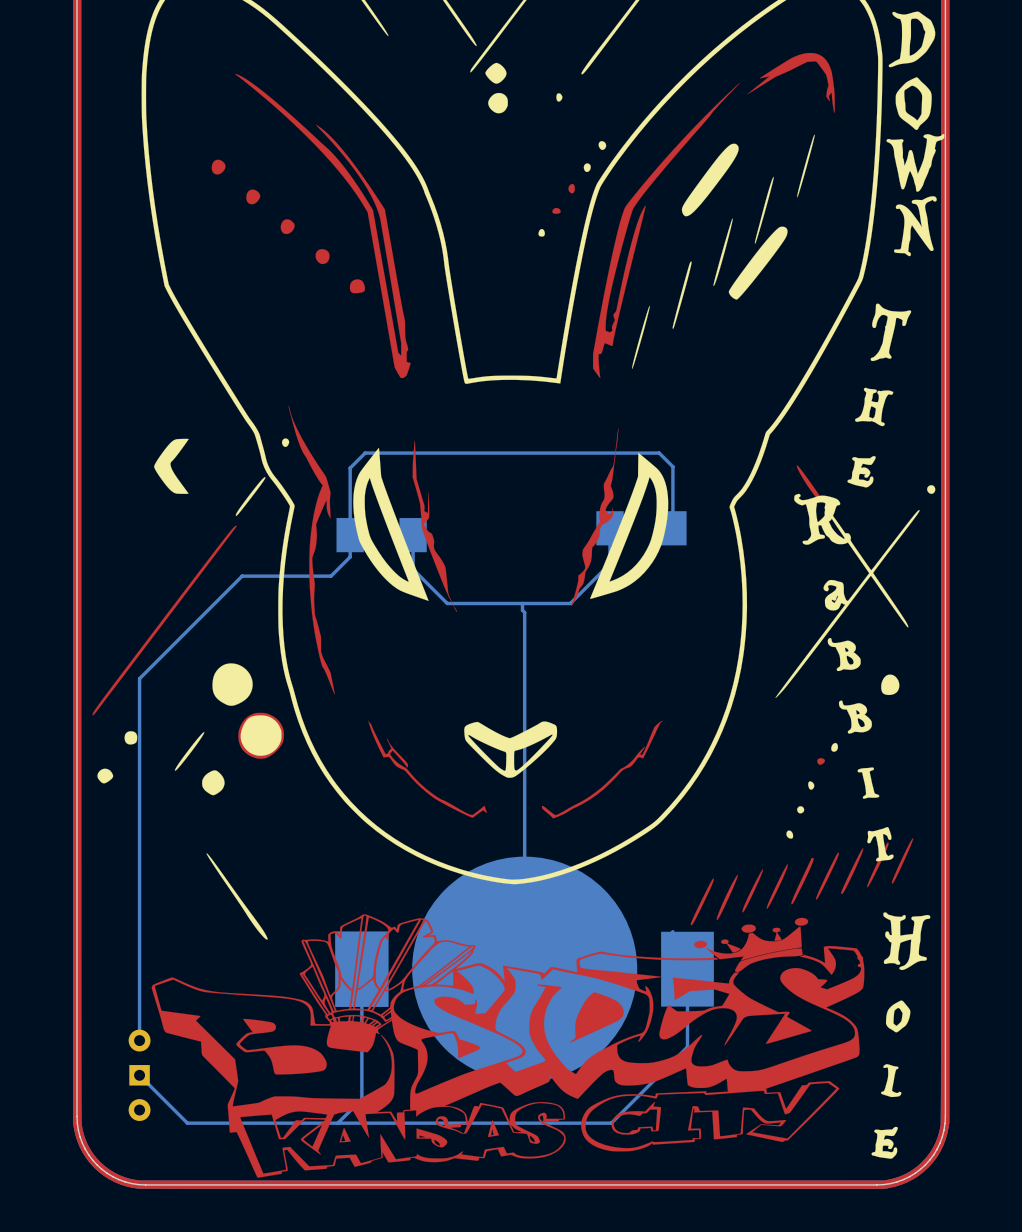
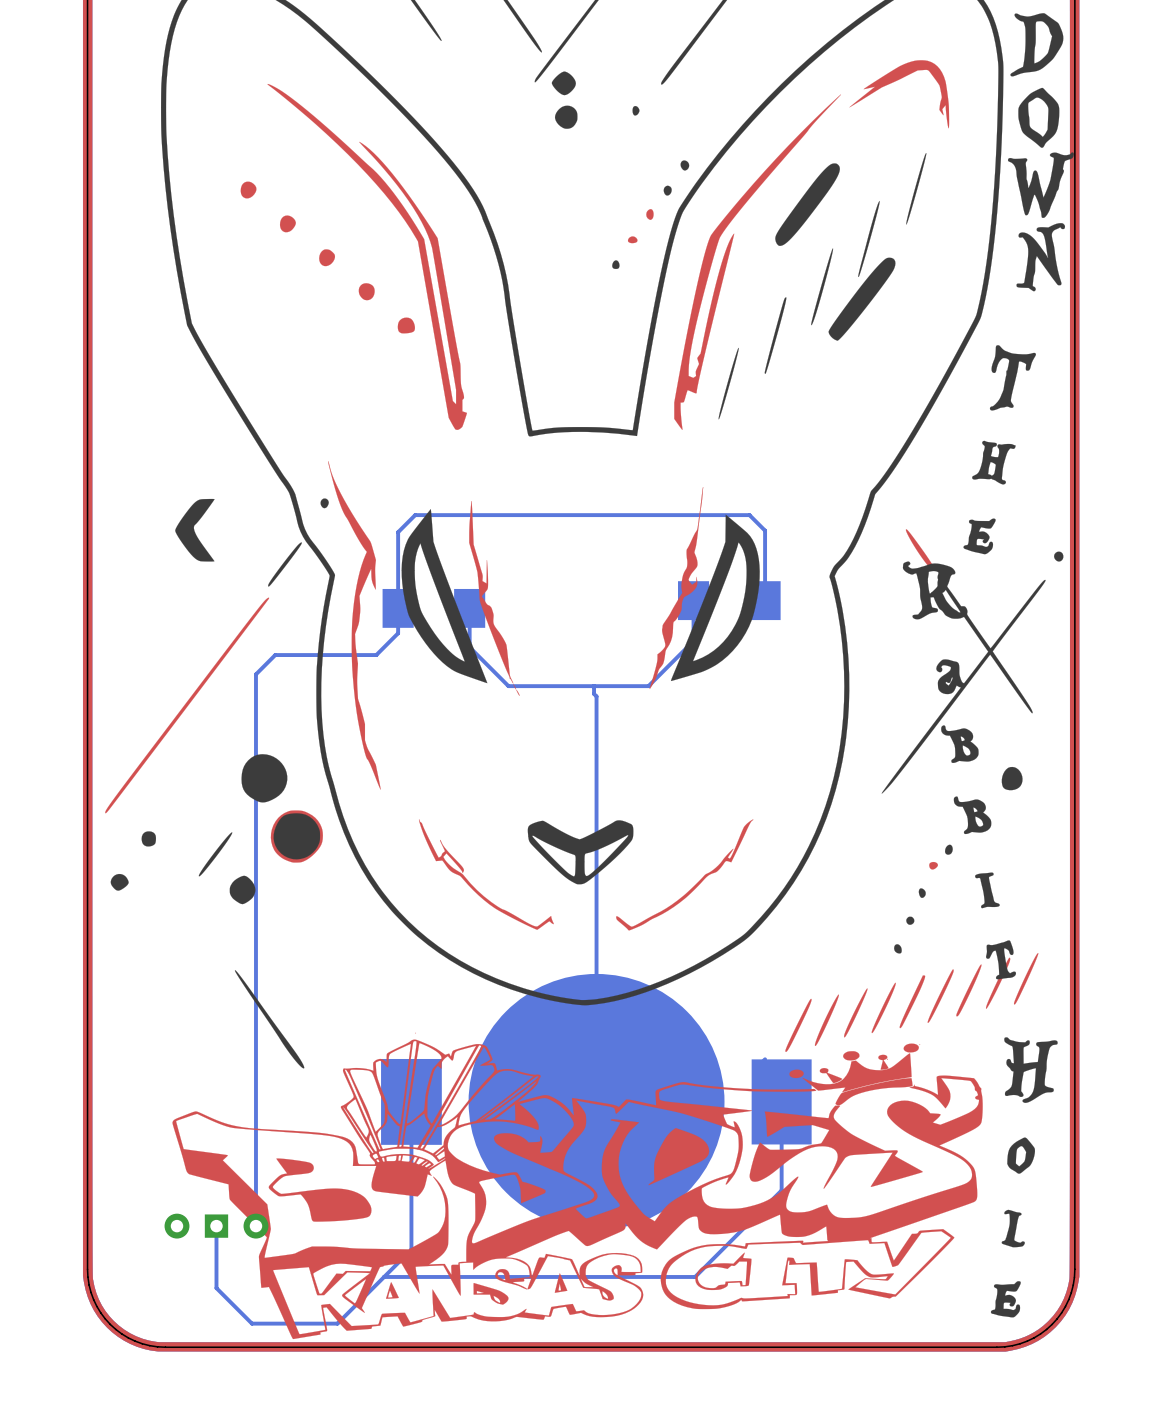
bottom track: (225, 593) (139, 678) (139, 1040) -> (255, 674) (255, 1226)
bottom track: (139, 1075) (187, 1123) (337, 1123) -> (216, 1226) (216, 1288) (251, 1323) (337, 1323) (384, 1276)
part rotation: 0° (139, 1075) -> 90° clockwise (216, 1226)

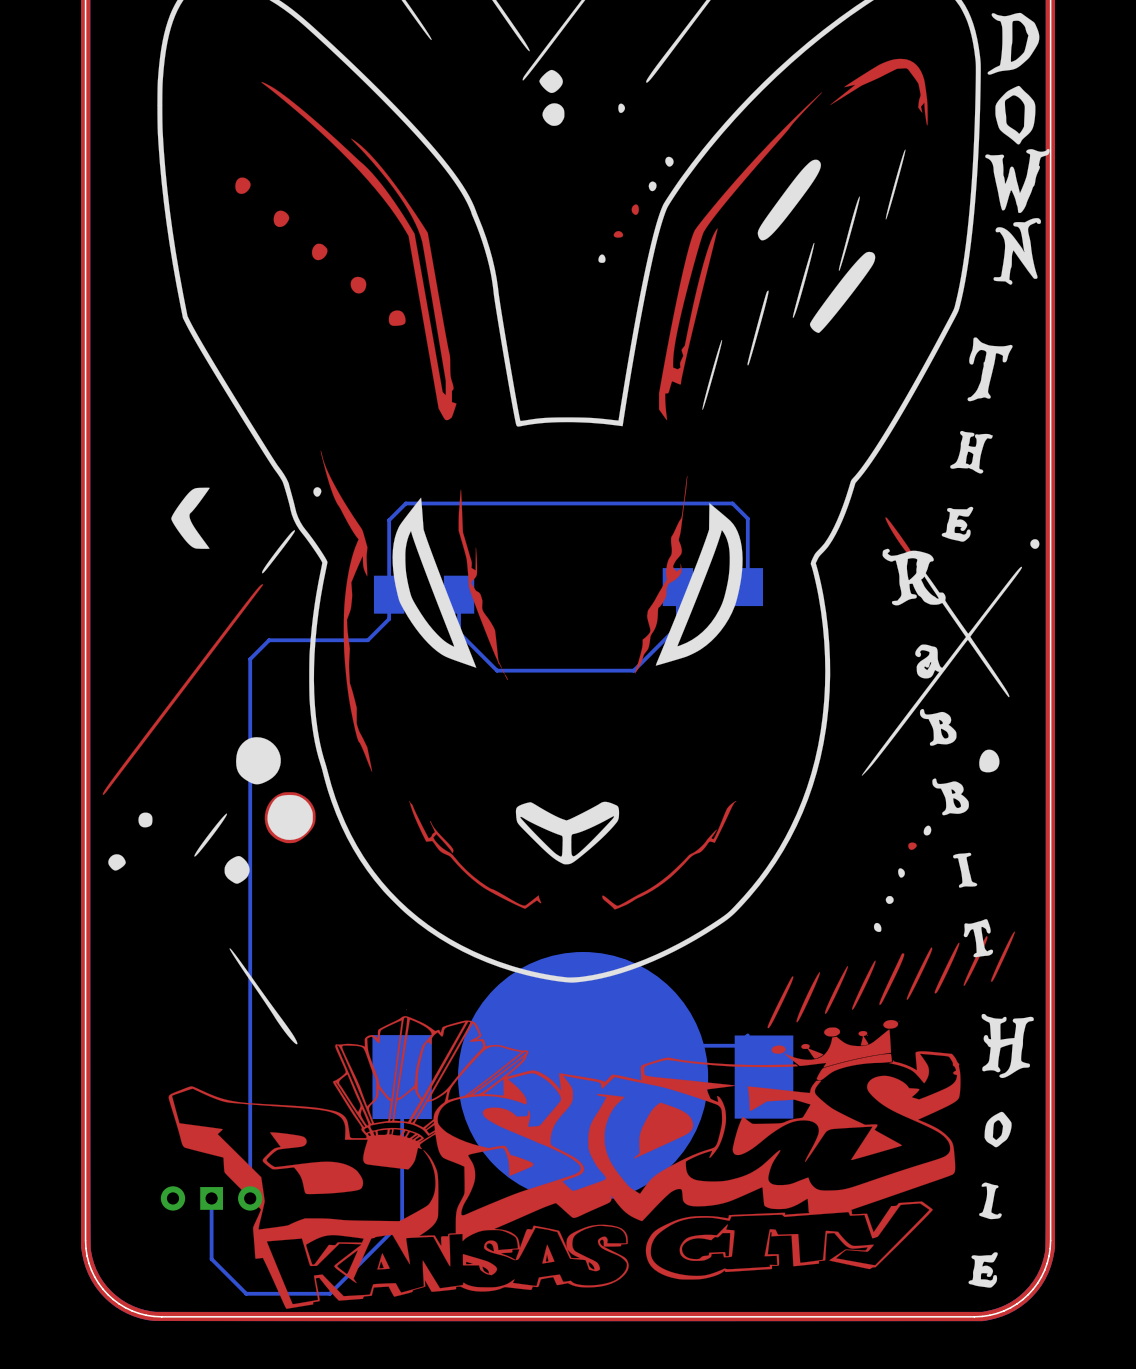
bottom track: (594, 686) (594, 693) (596, 696) (596, 1101) -> none
bottom track: none -> (682, 1045) (737, 1045)
bottom track: (781, 1101) (781, 1190) (695, 1276) (384, 1276) -> none

